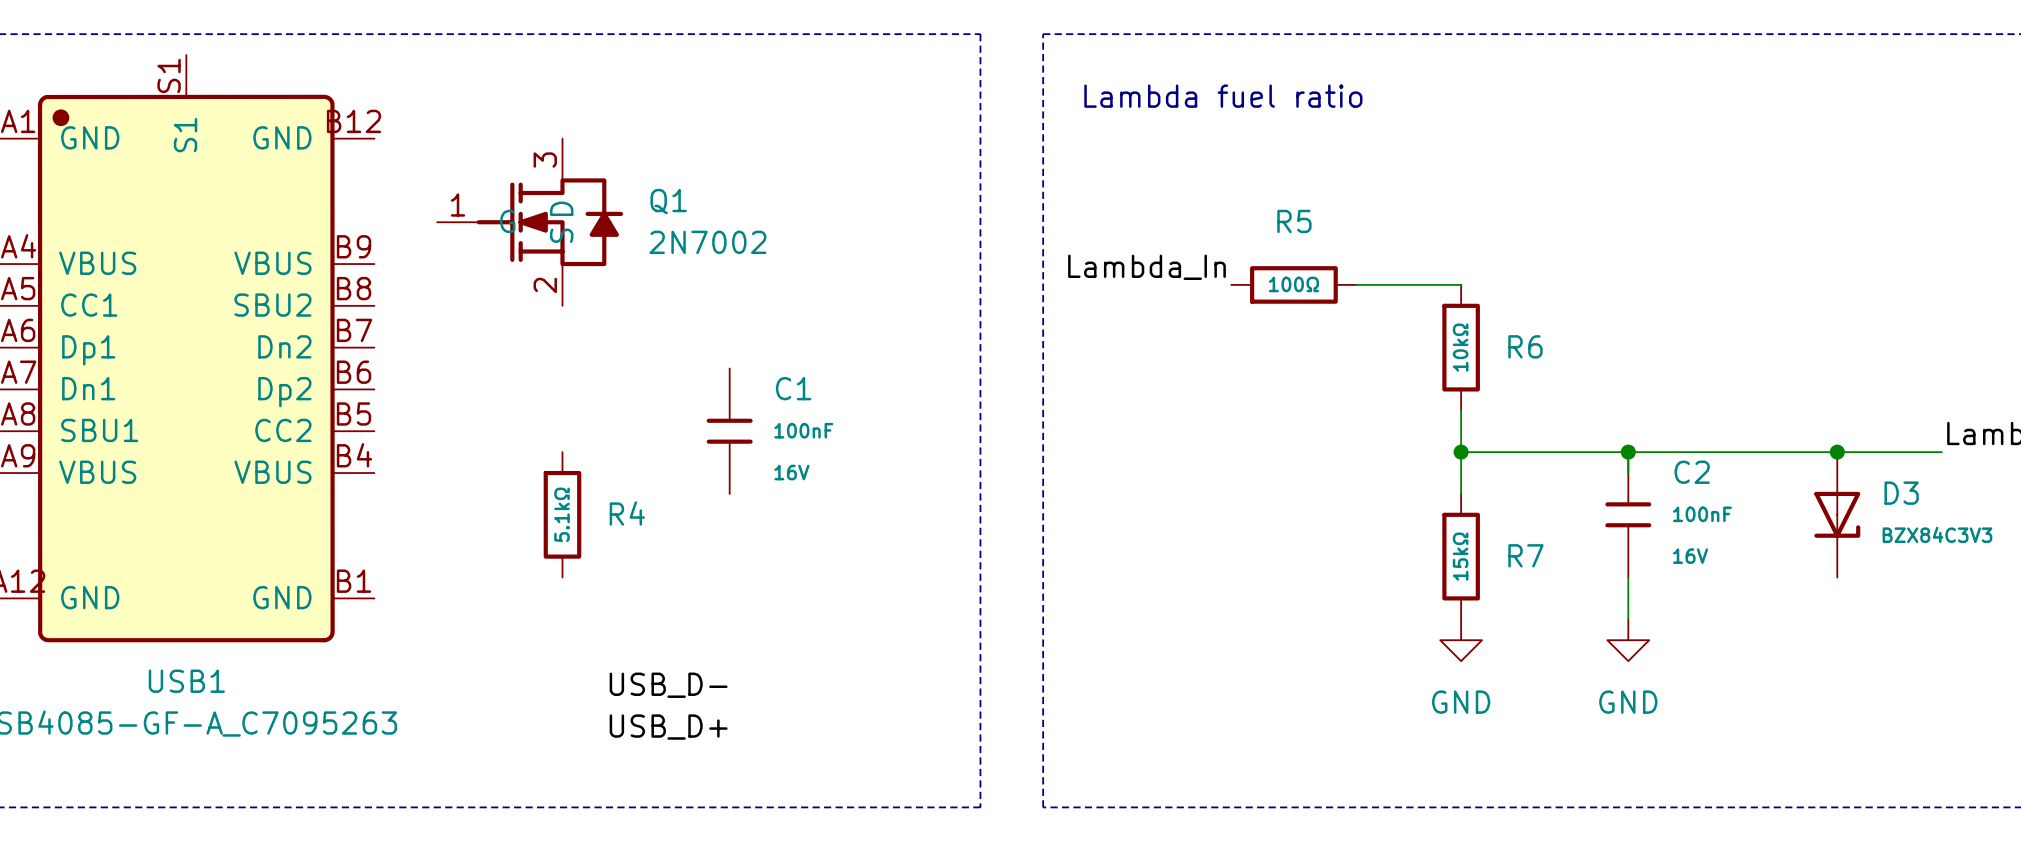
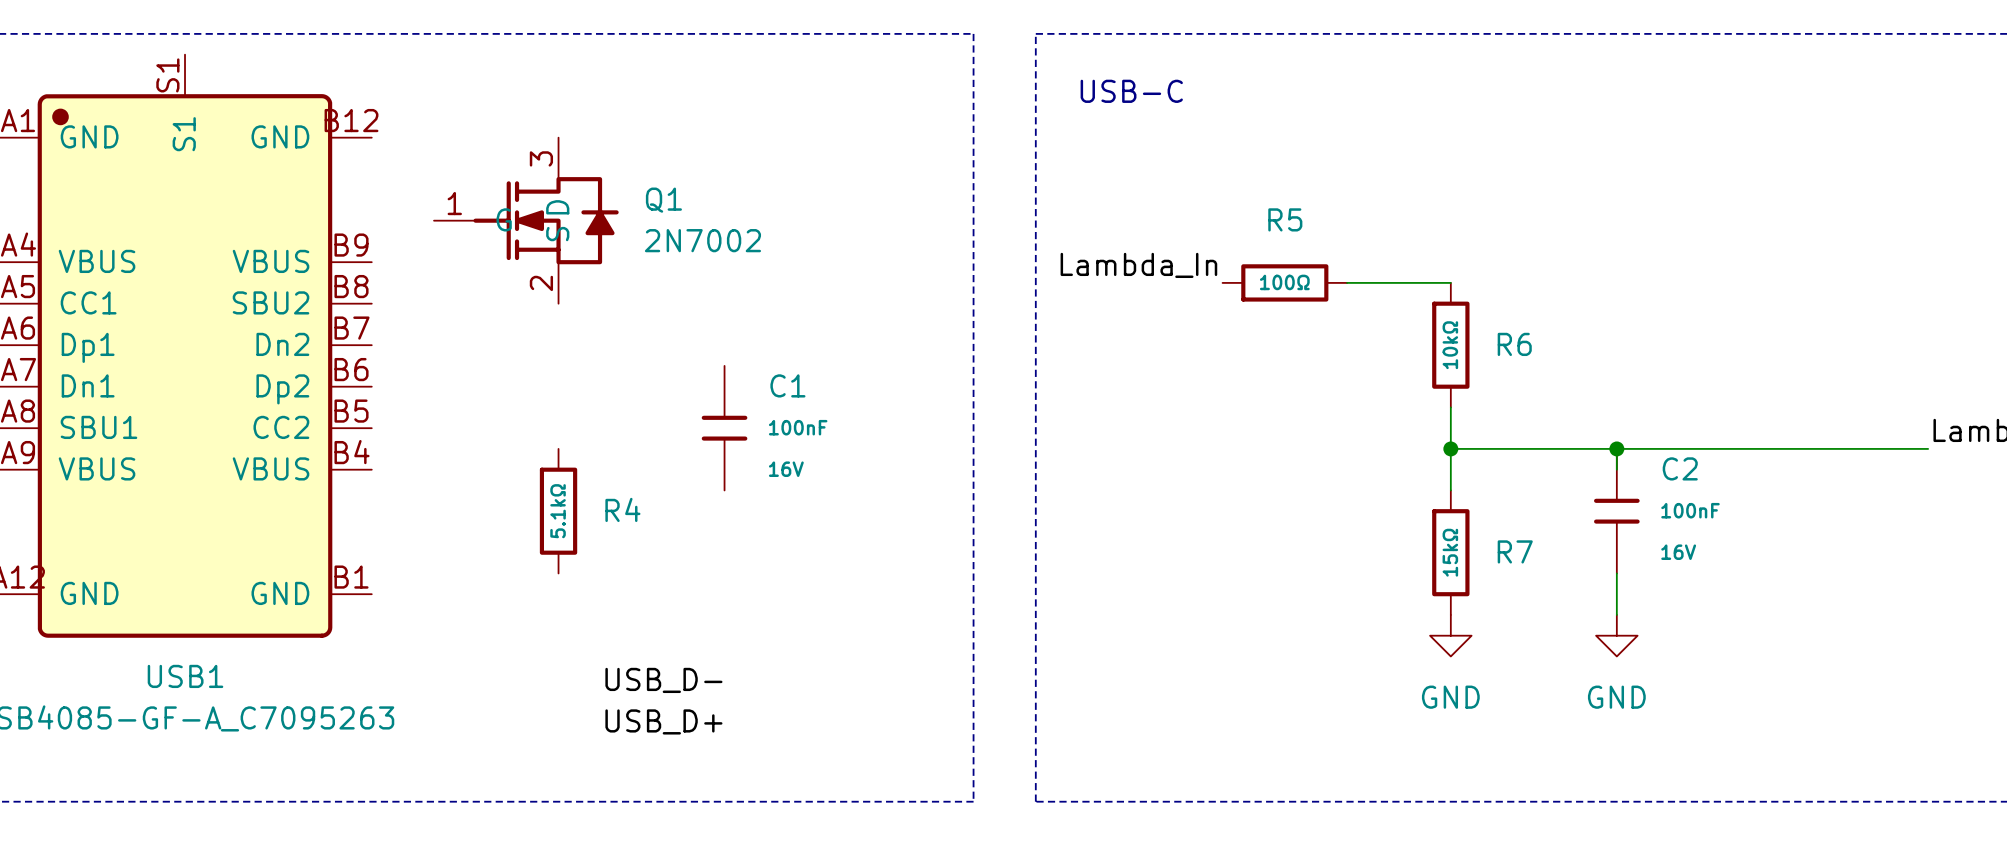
text: none -> USB-C (1131, 91)
text: Lambda fuel ratio (1223, 96) -> none
junction: (1837, 452) -> none
D3: BZX84C3V3 (1837, 514) -> none

